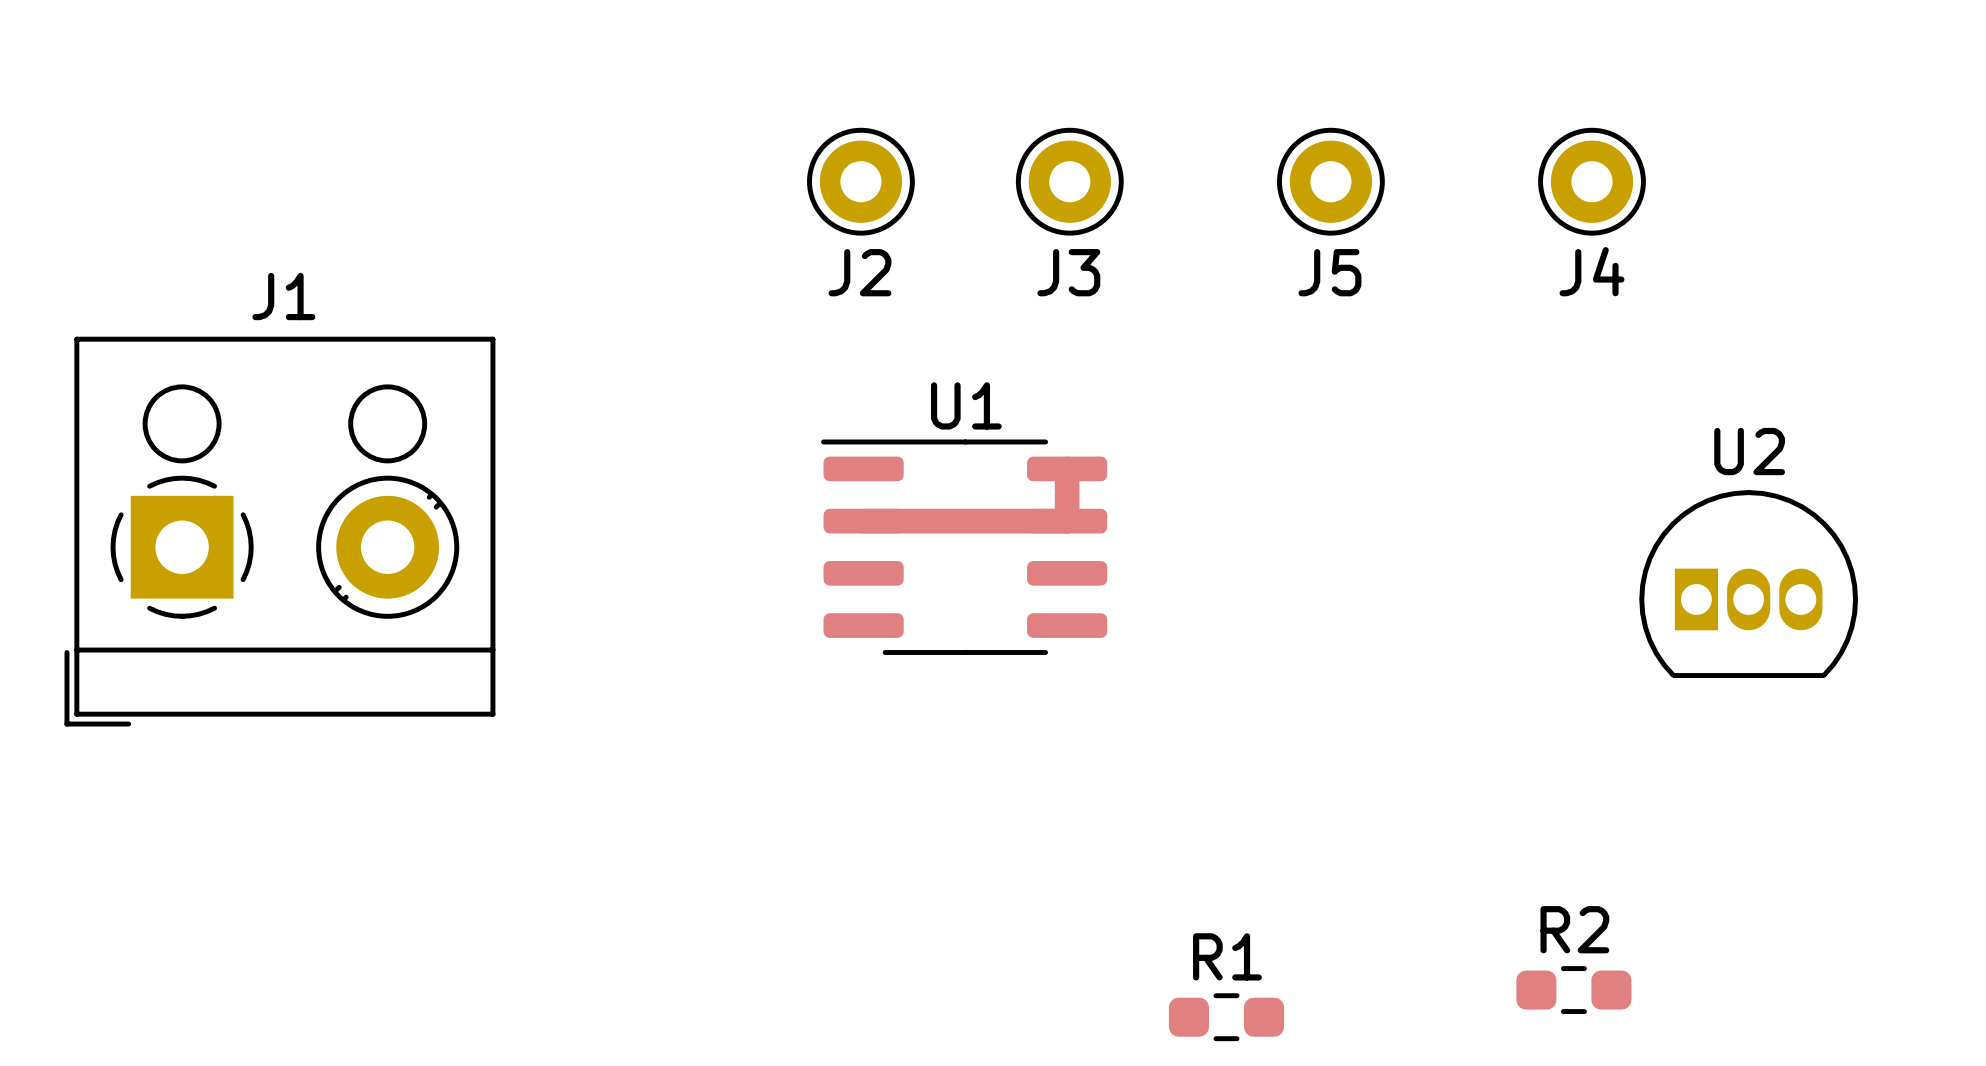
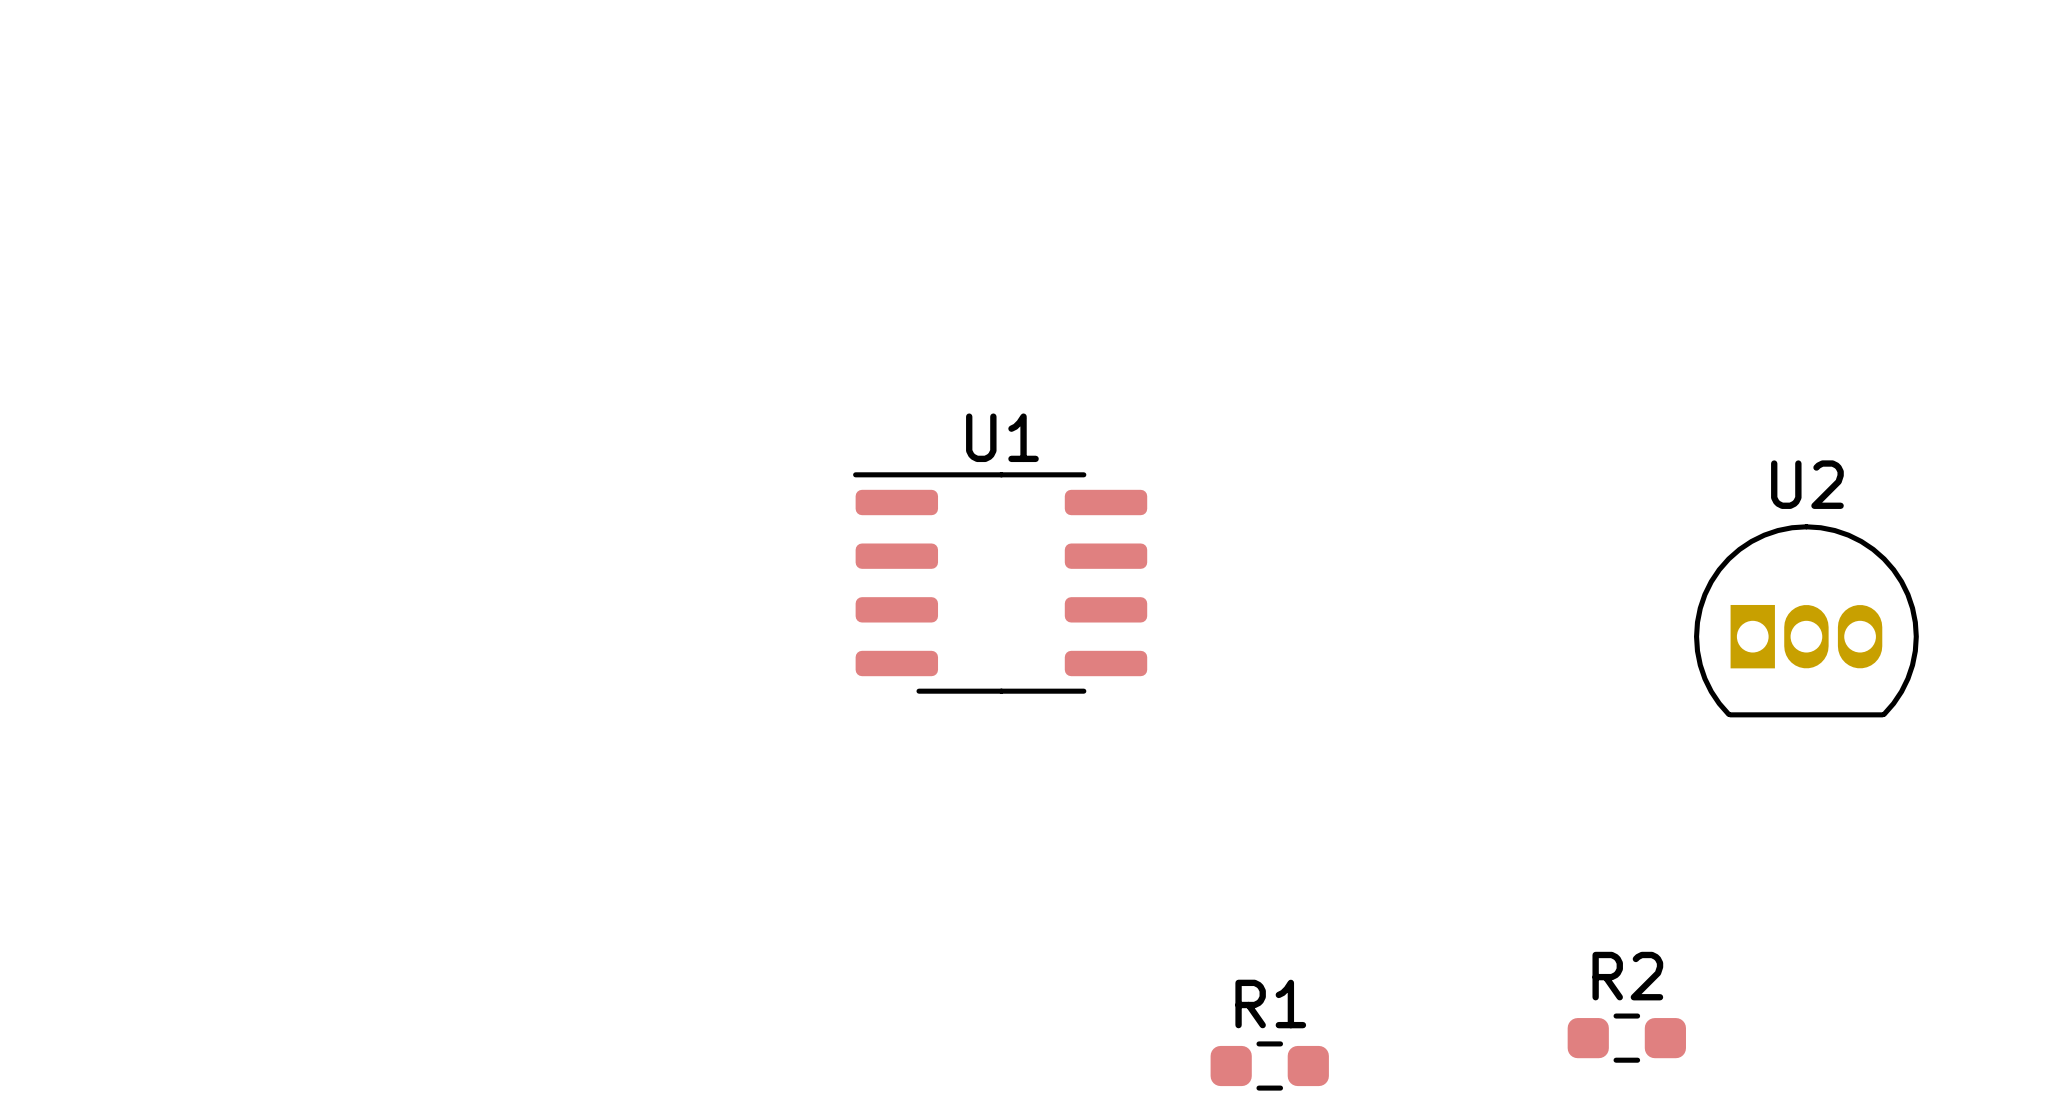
J2: (860, 181) -> none
J3: (1069, 181) -> none
J5: (1330, 181) -> none
J4: (1592, 181) -> none
track: (1067, 468) (1067, 521) (863, 521) -> none
J1: (279, 531) -> none

